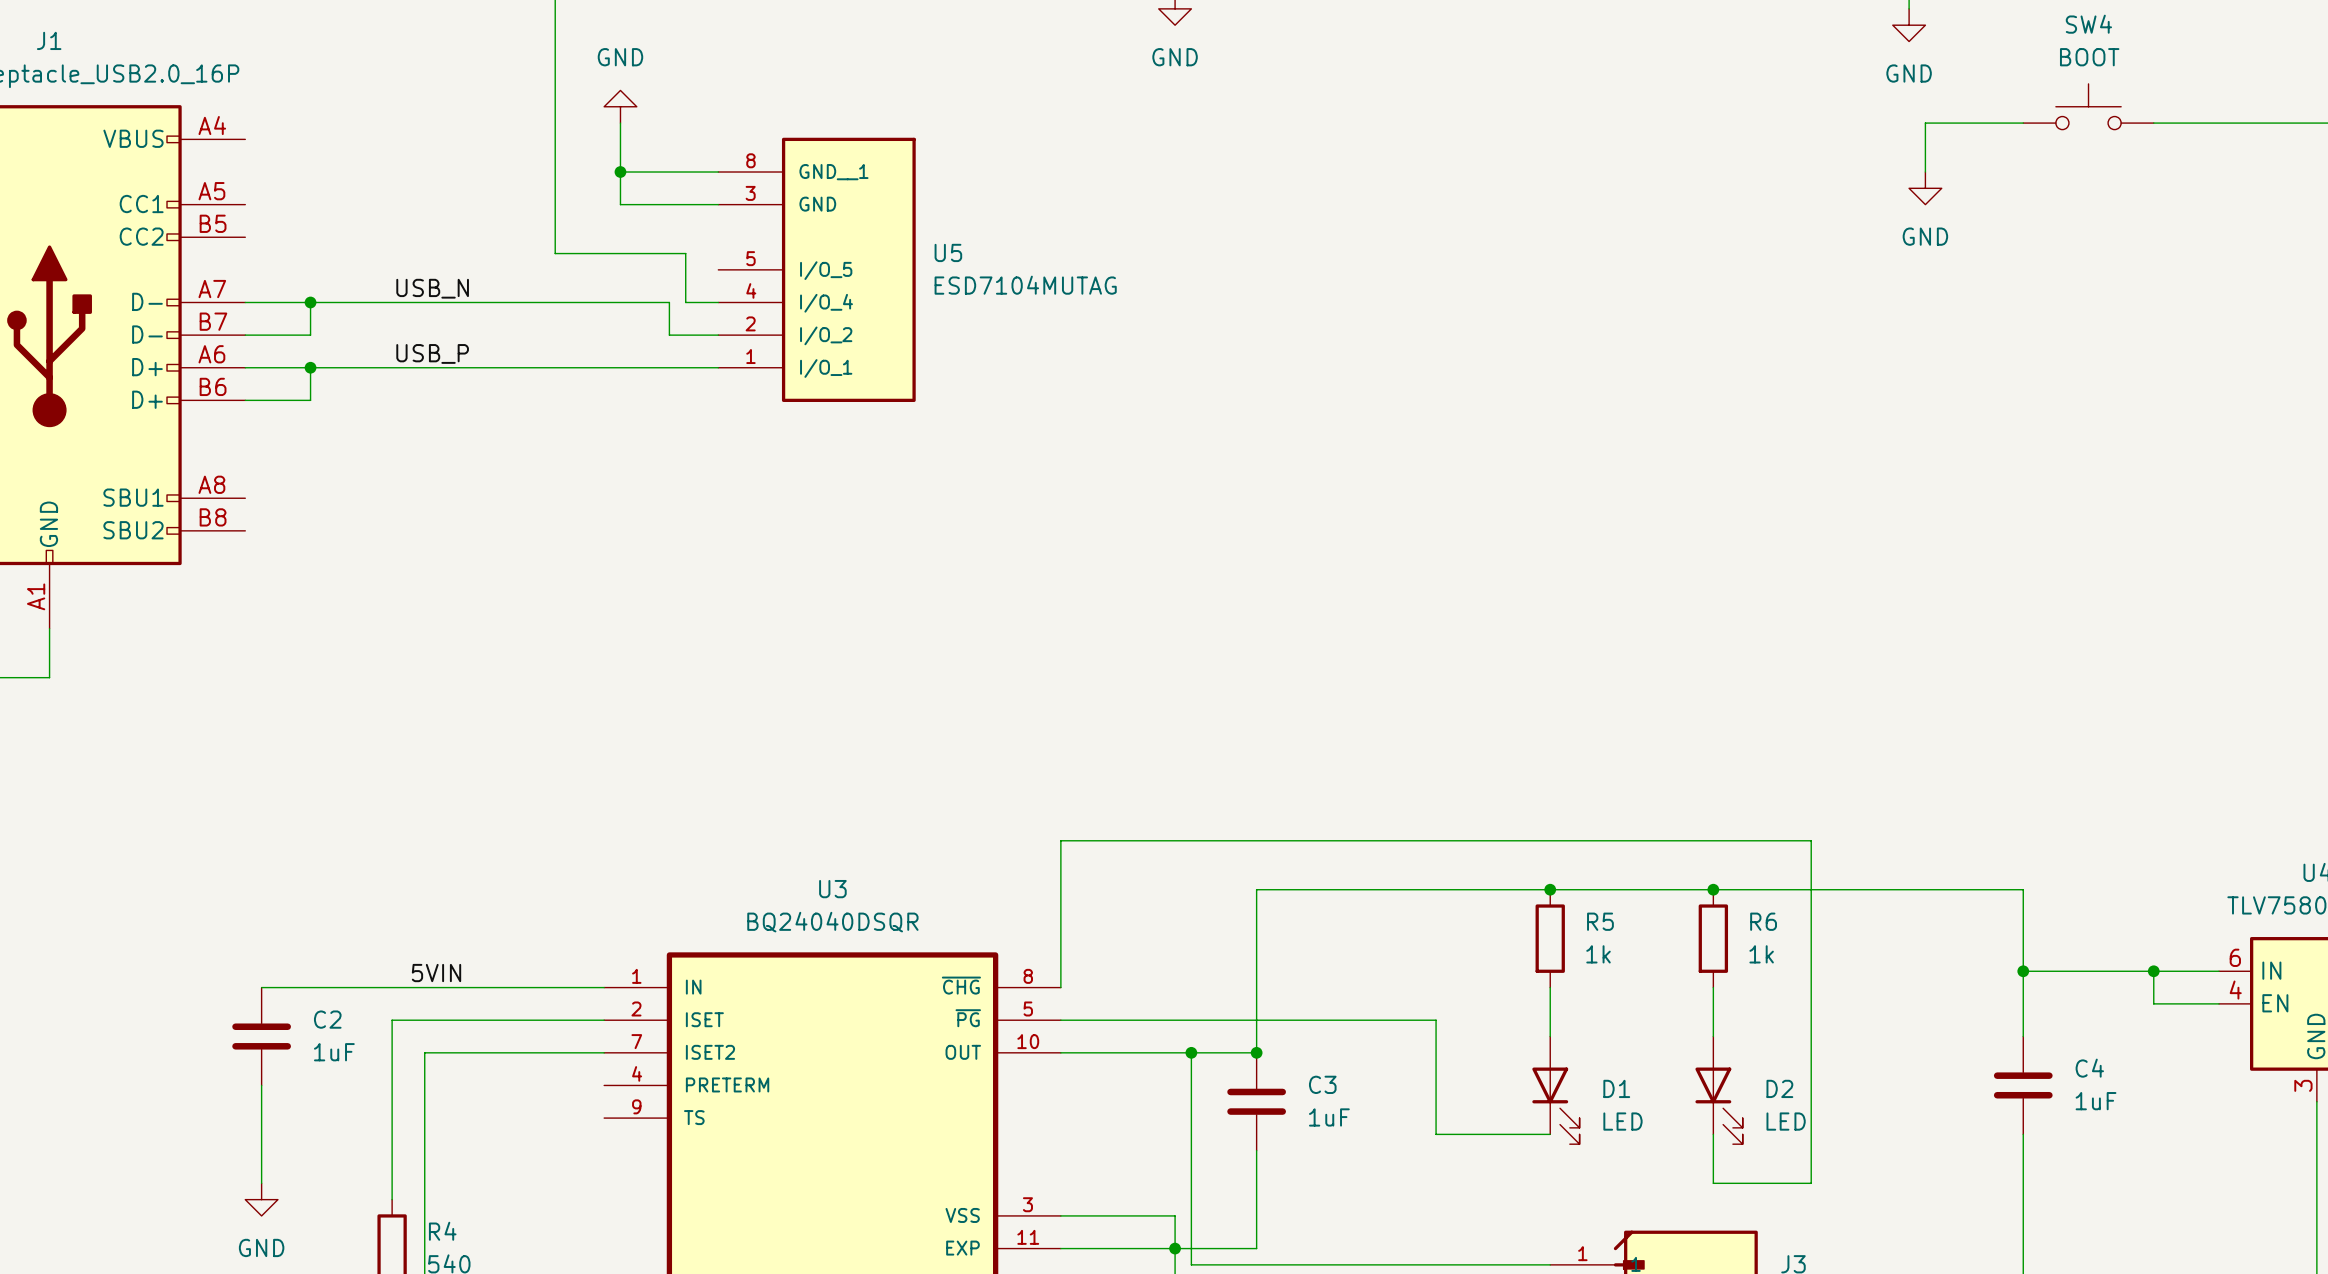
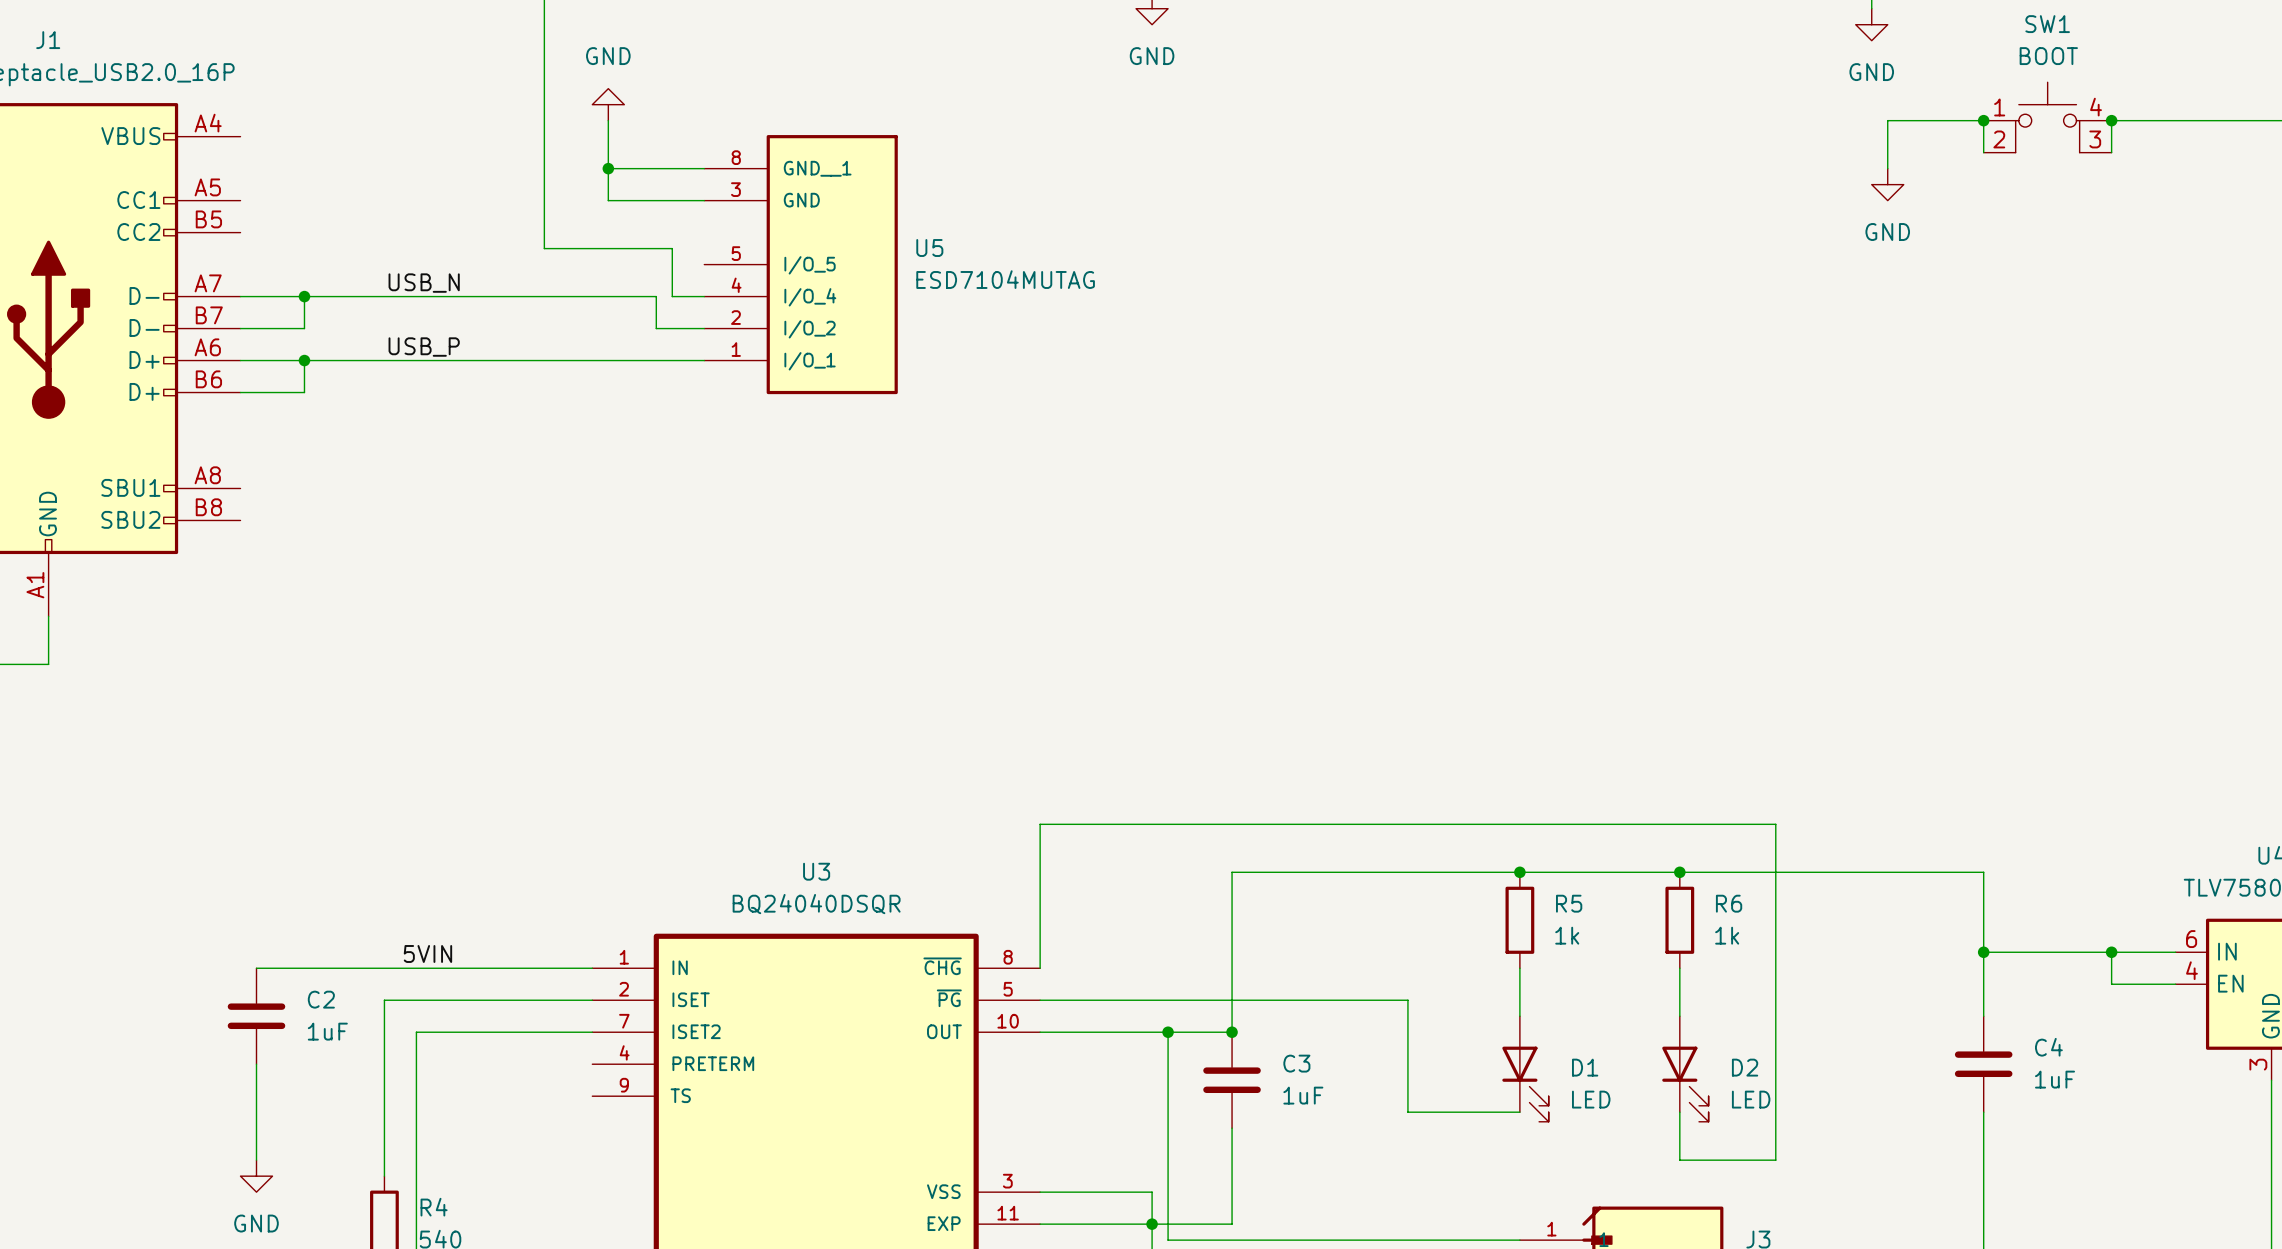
SW4: BOOT (2088, 106) -> none
SW1: none -> BOOT (2047, 117)
wire: none -> (1983, 120) (1983, 152)
junction: none -> (1983, 120)
wire: none -> (2111, 120) (2111, 152)
junction: none -> (2111, 120)

